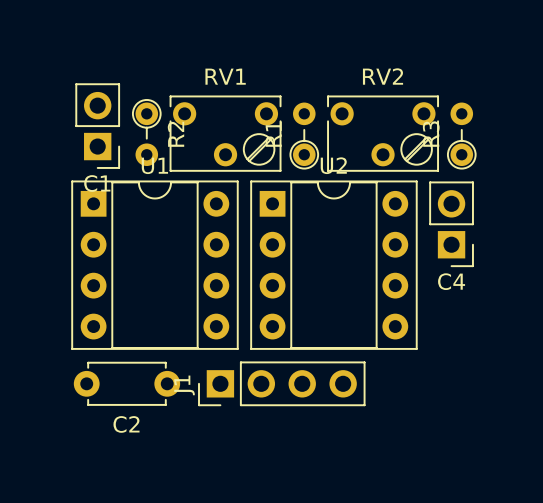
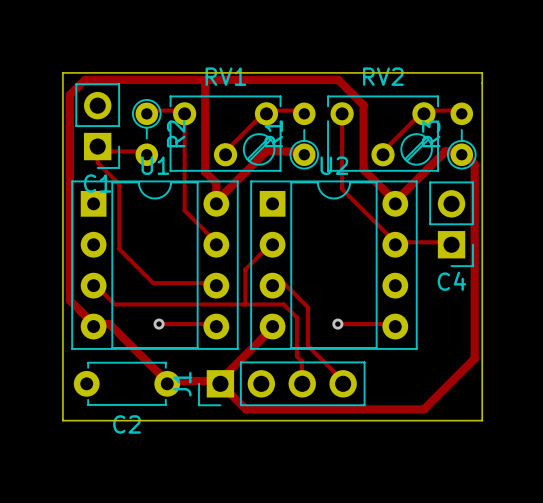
board edge: none -> (62, 72) (482, 72) (482, 420) (62, 420) (62, 72)
track: none -> (207, 79) (205, 82) (205, 172) (216, 183) (216, 201) (266, 151) (304, 151)
track: none -> (146, 110) (184, 110) (184, 210) (216, 242)
track: none -> (304, 110) (266, 110) (225, 151)
track: none -> (342, 110) (342, 189) (395, 242) (449, 242) (451, 244)
track: none -> (461, 110) (423, 110) (383, 151)
track: none -> (146, 151) (104, 151) (97, 144) (97, 162) (119, 184) (119, 249) (153, 283) (216, 283)
track: none -> (272, 242) (245, 269) (245, 304)
track: none -> (93, 283) (114, 304) (283, 304) (296, 317) (296, 356) (301, 361) (301, 380)
track: none -> (272, 283) (283, 283) (307, 307) (307, 345) (342, 380)
track: none -> (159, 324) (216, 324)
via: none -> (159, 324)
track: none -> (272, 324) (272, 327) (219, 380) (166, 380) (109, 324) (93, 324) (69, 300) (69, 95) (85, 79) (338, 79) (363, 105) (363, 169) (395, 201) (445, 151) (461, 151) (474, 164) (474, 358) (423, 409) (245, 409) (220, 383) (220, 380)
track: none -> (337, 324) (395, 324)
via: none -> (337, 324)

